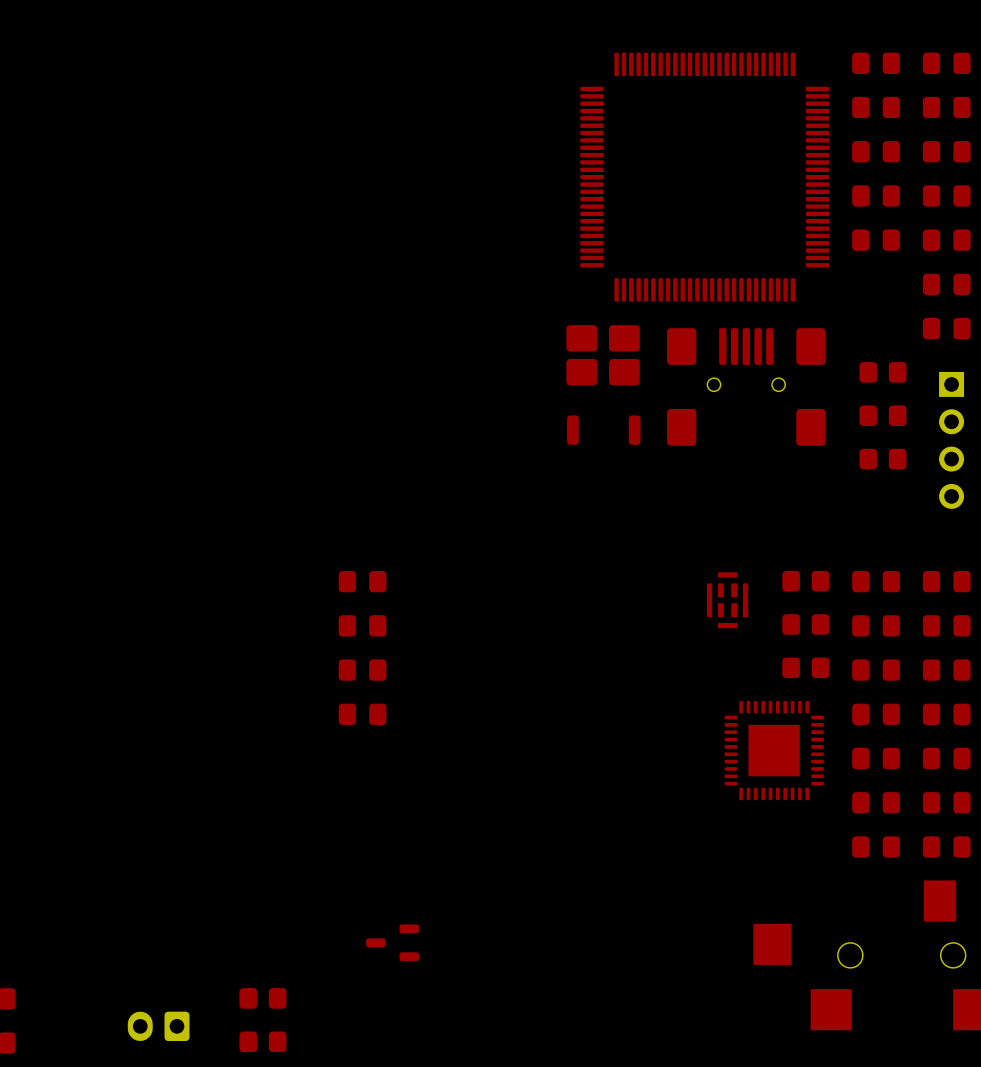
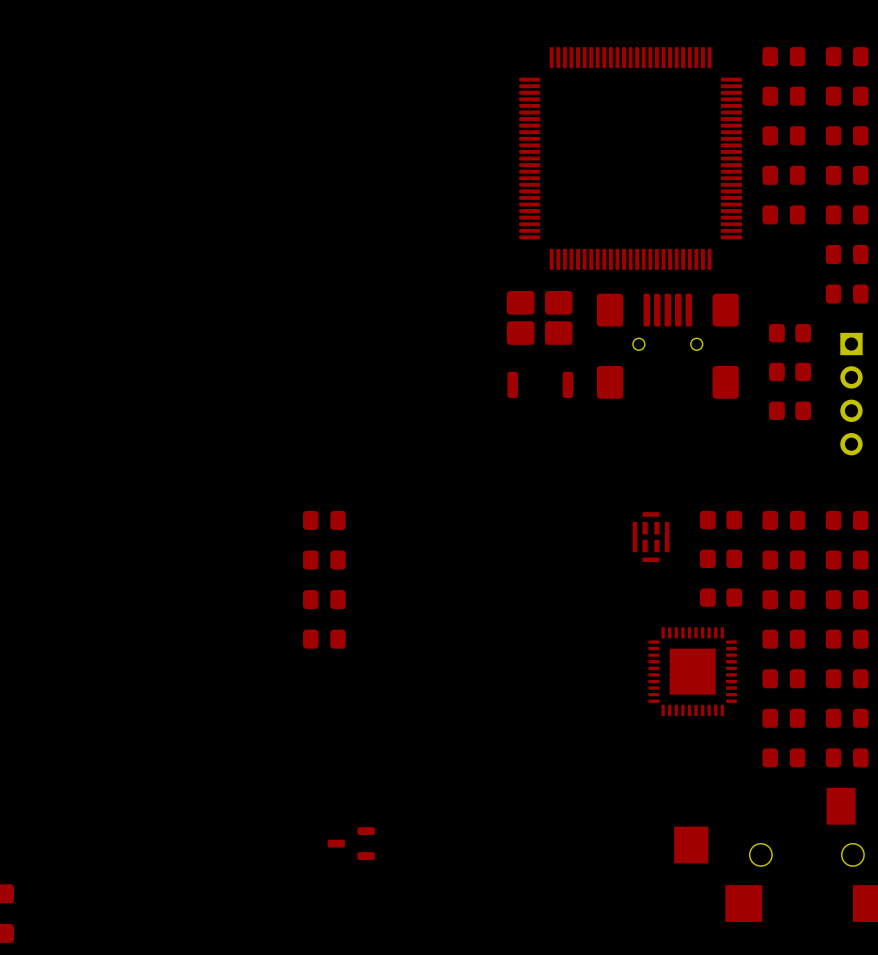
part: (262, 998) -> none
part: (158, 1026) -> none
part: (262, 1041) -> none

